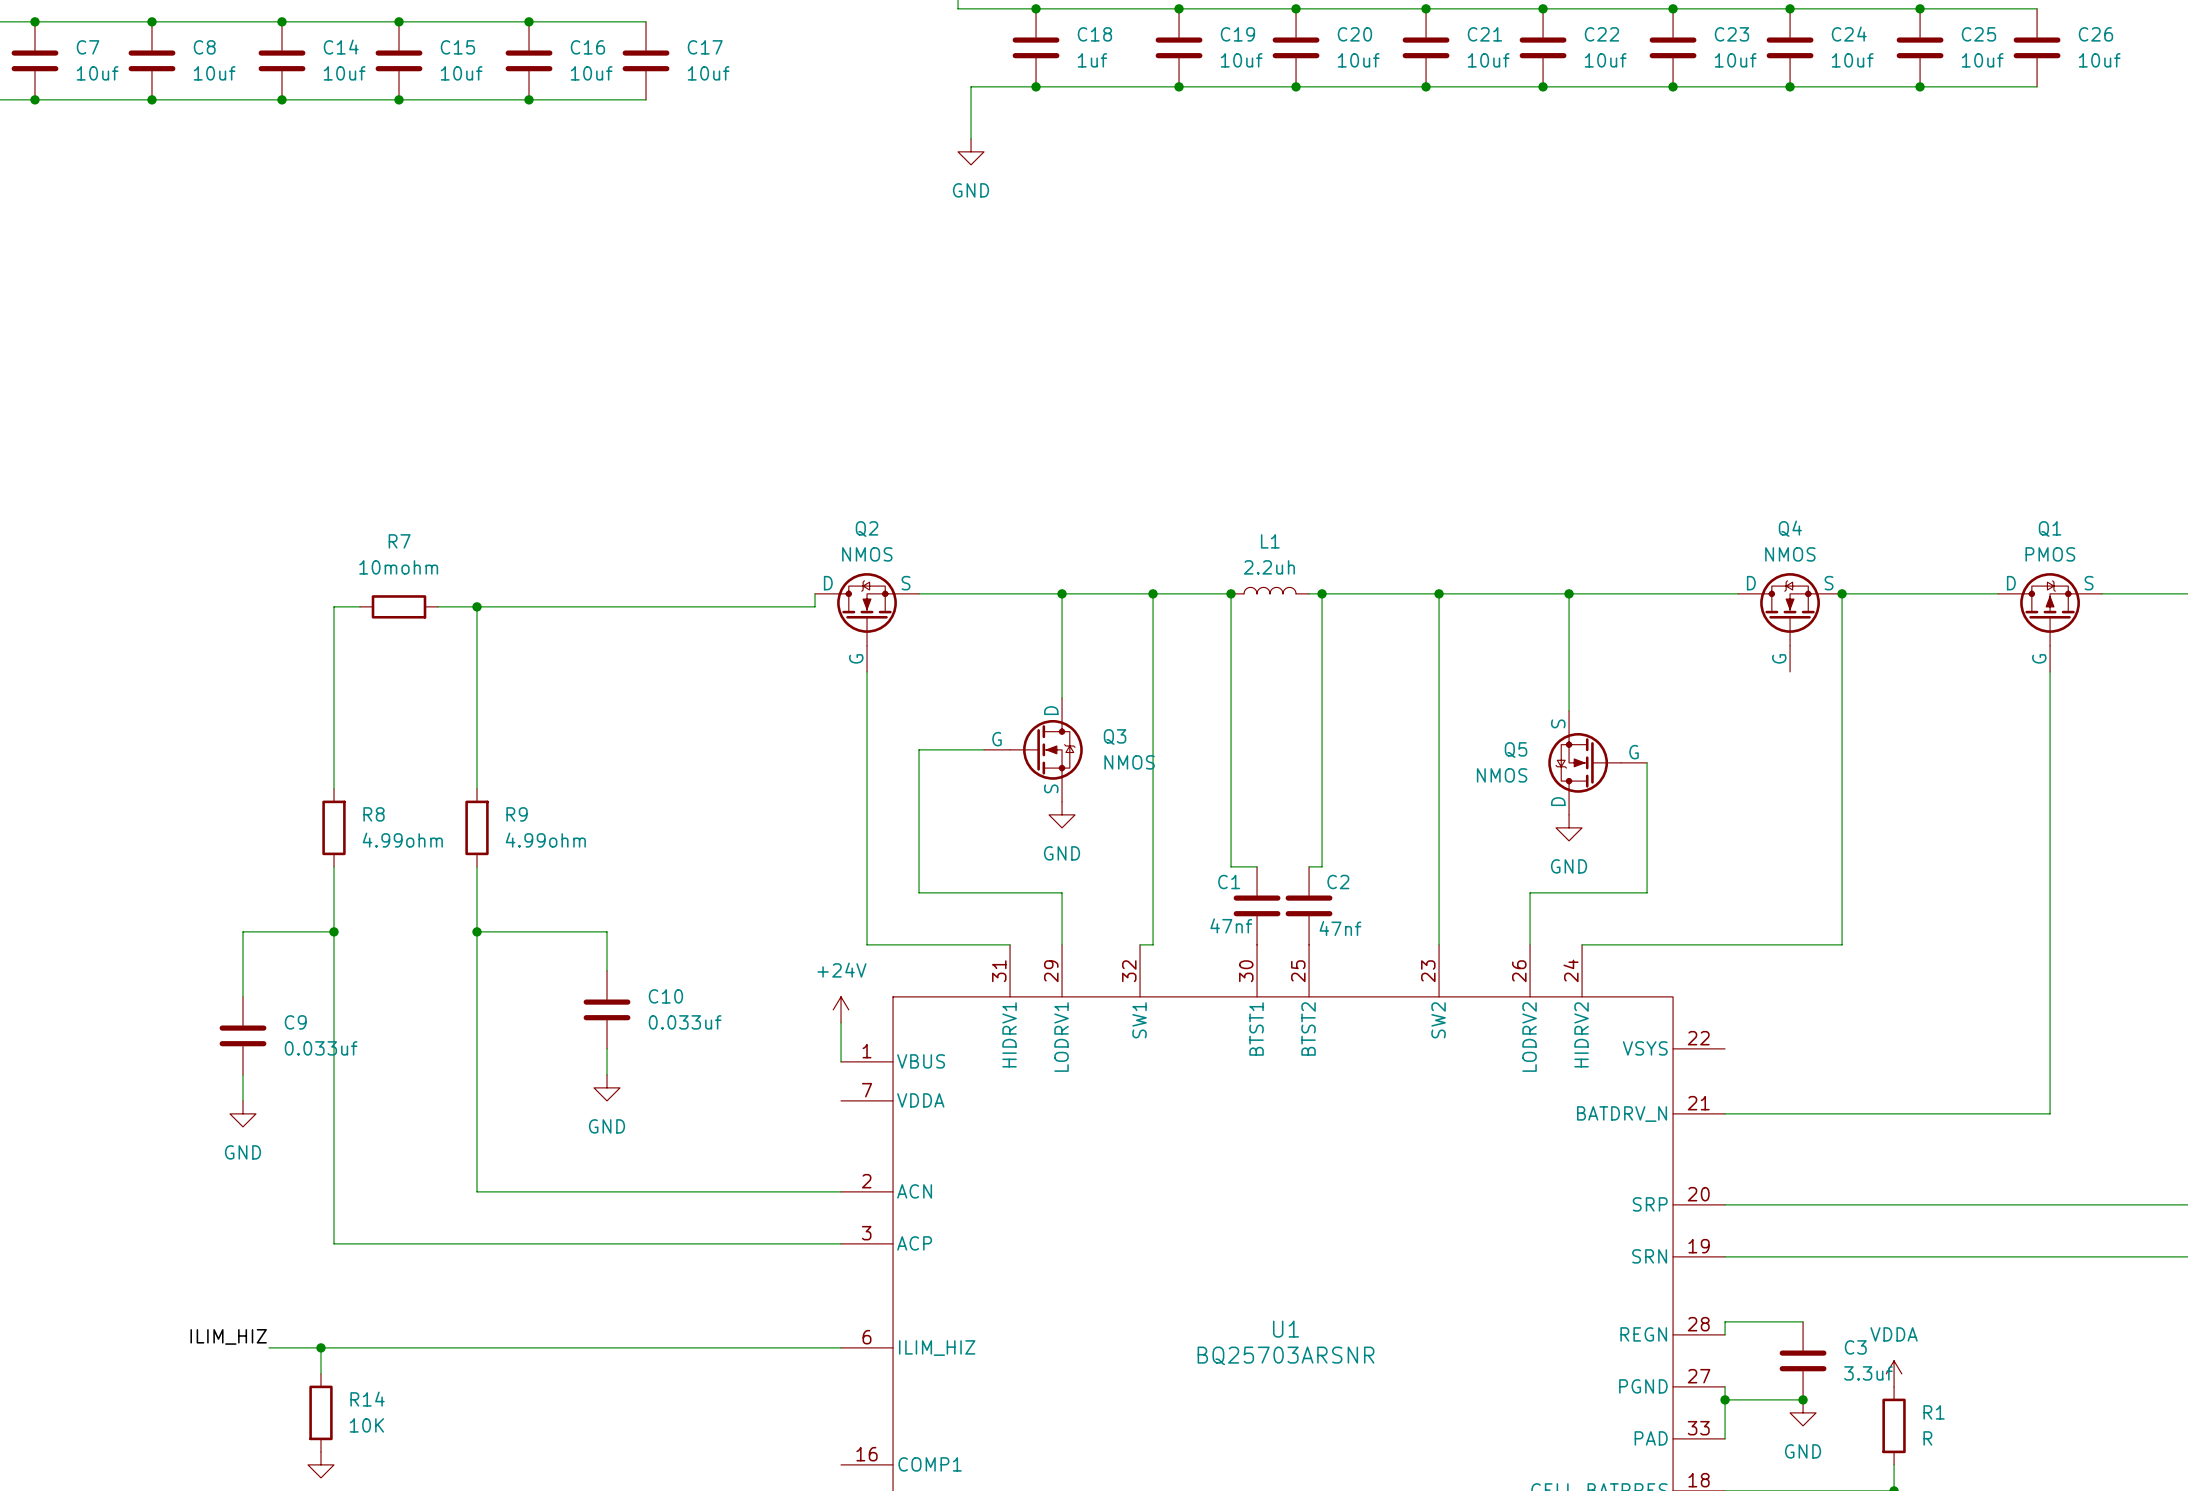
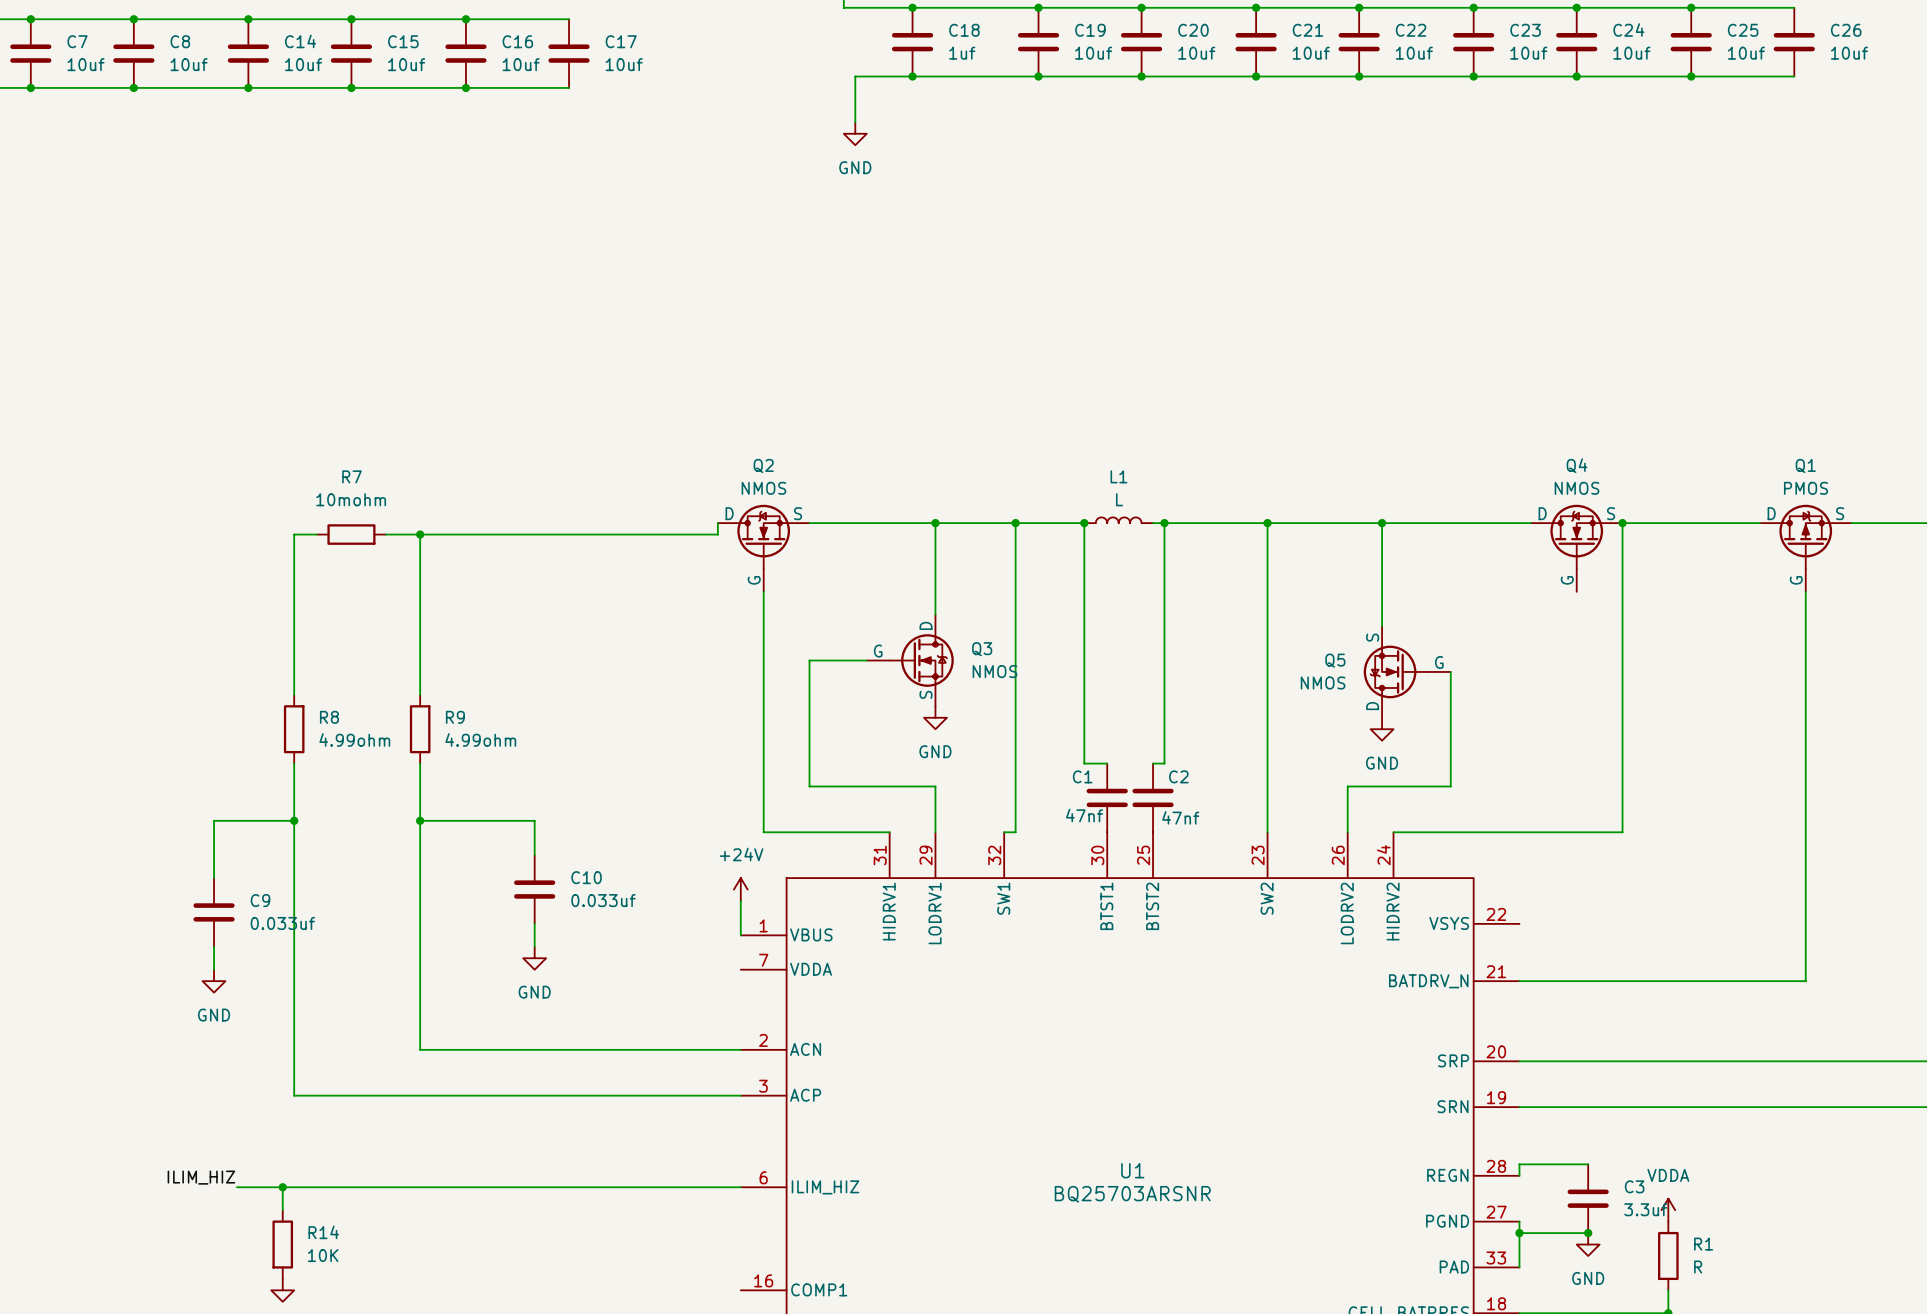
L1 value: 2.2uh (1269, 567) -> L (1119, 499)

